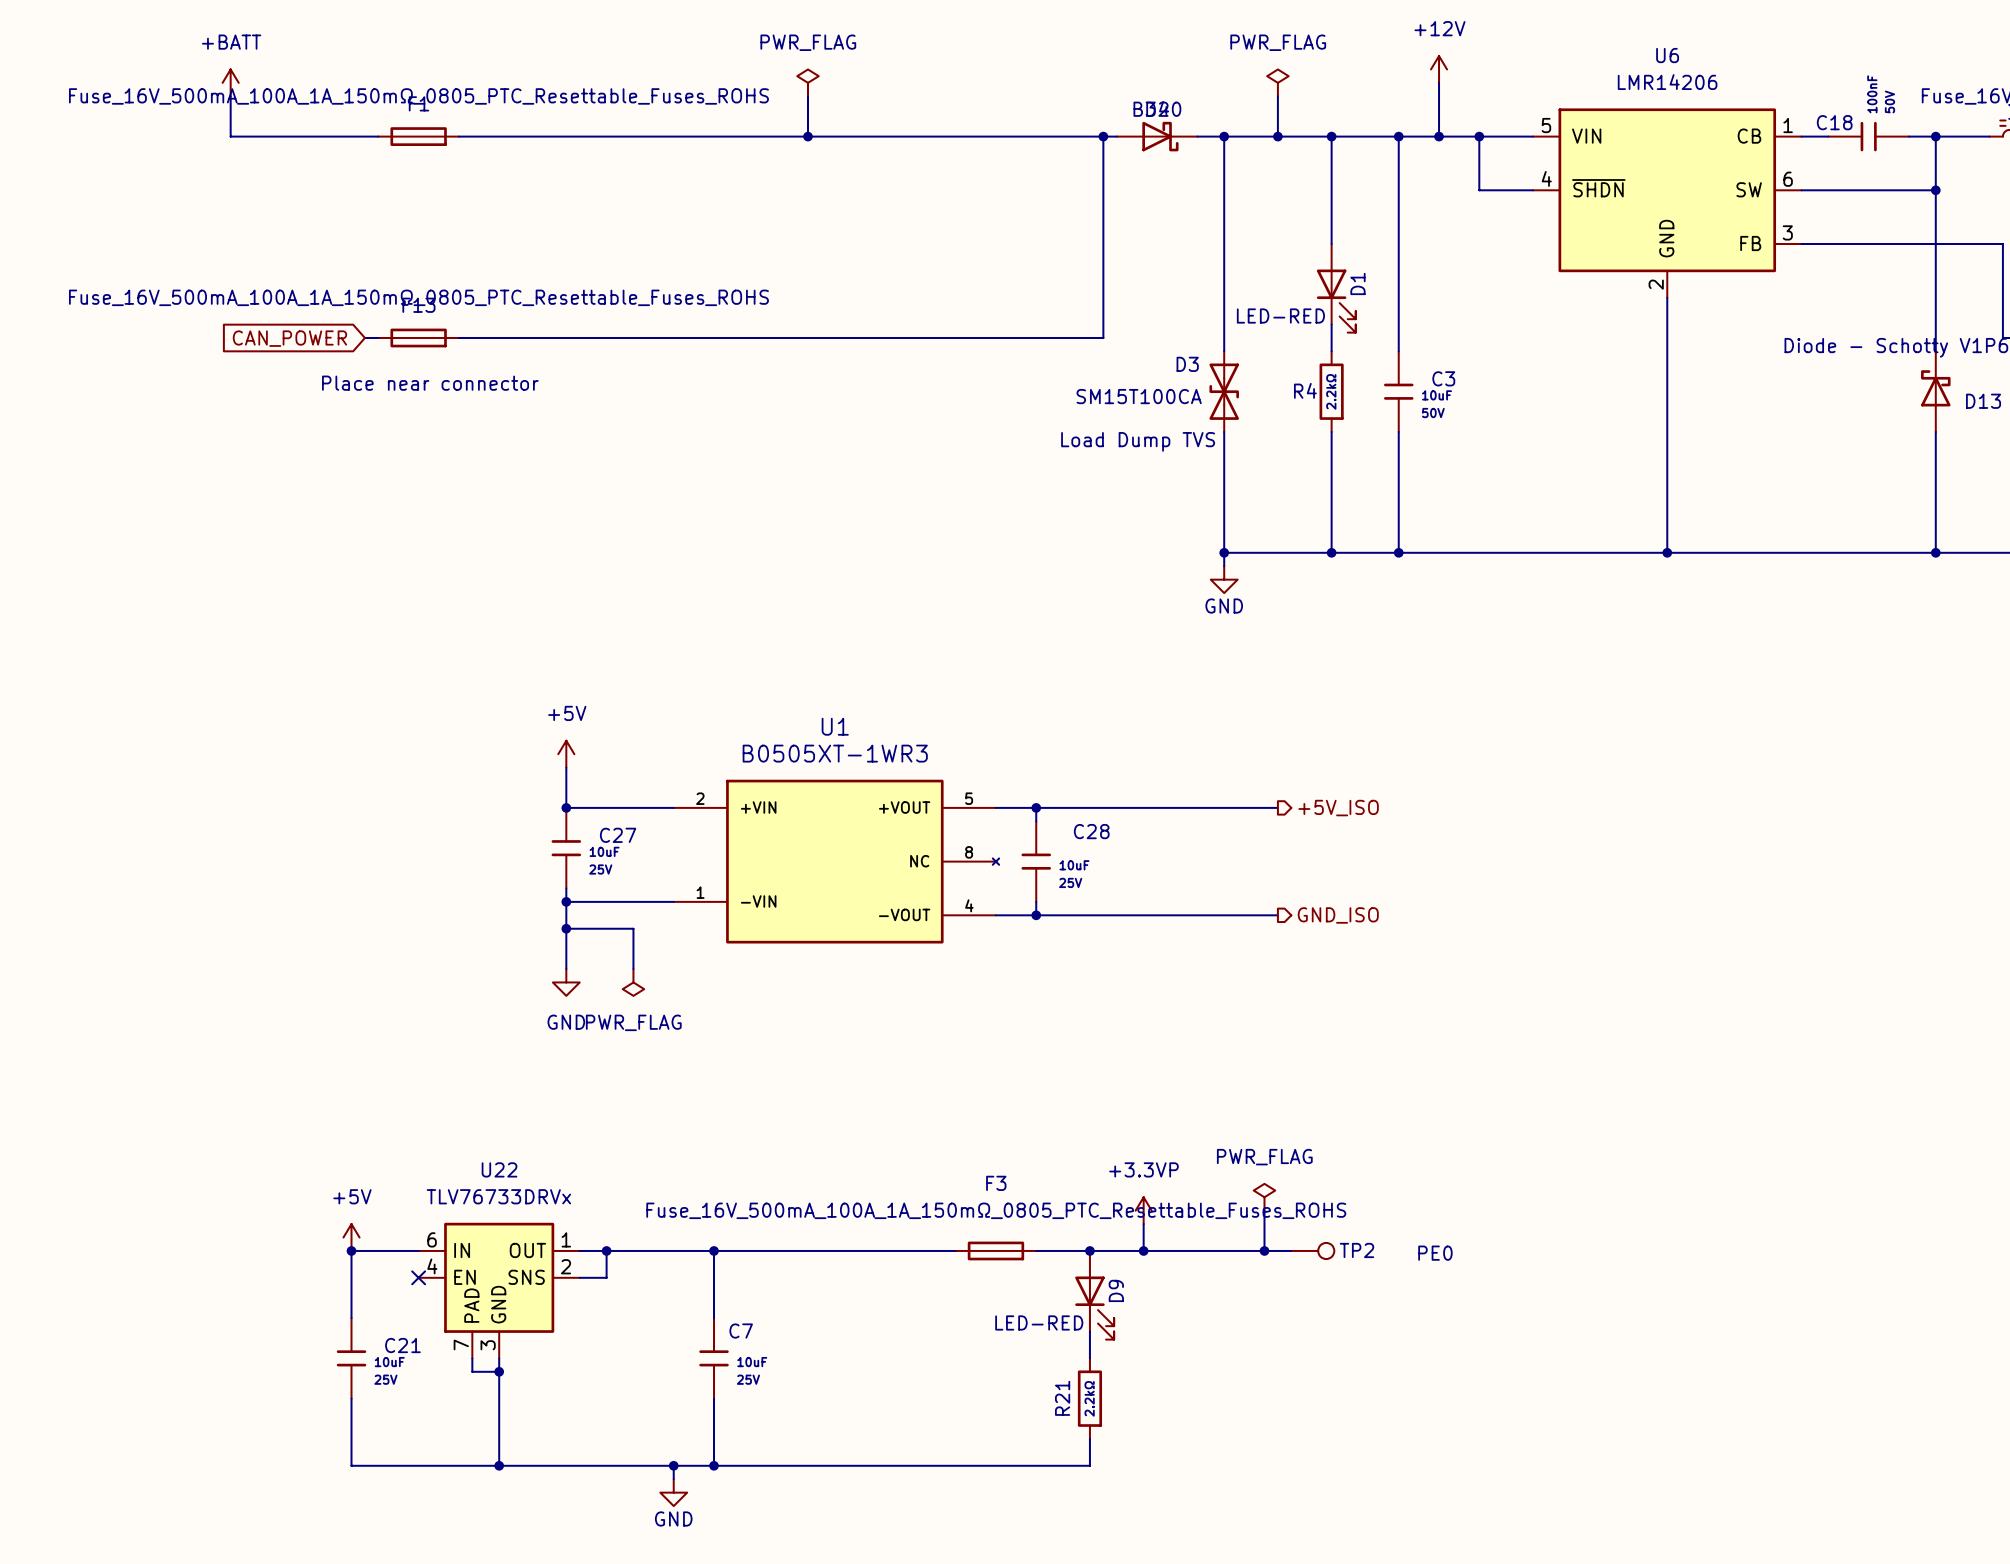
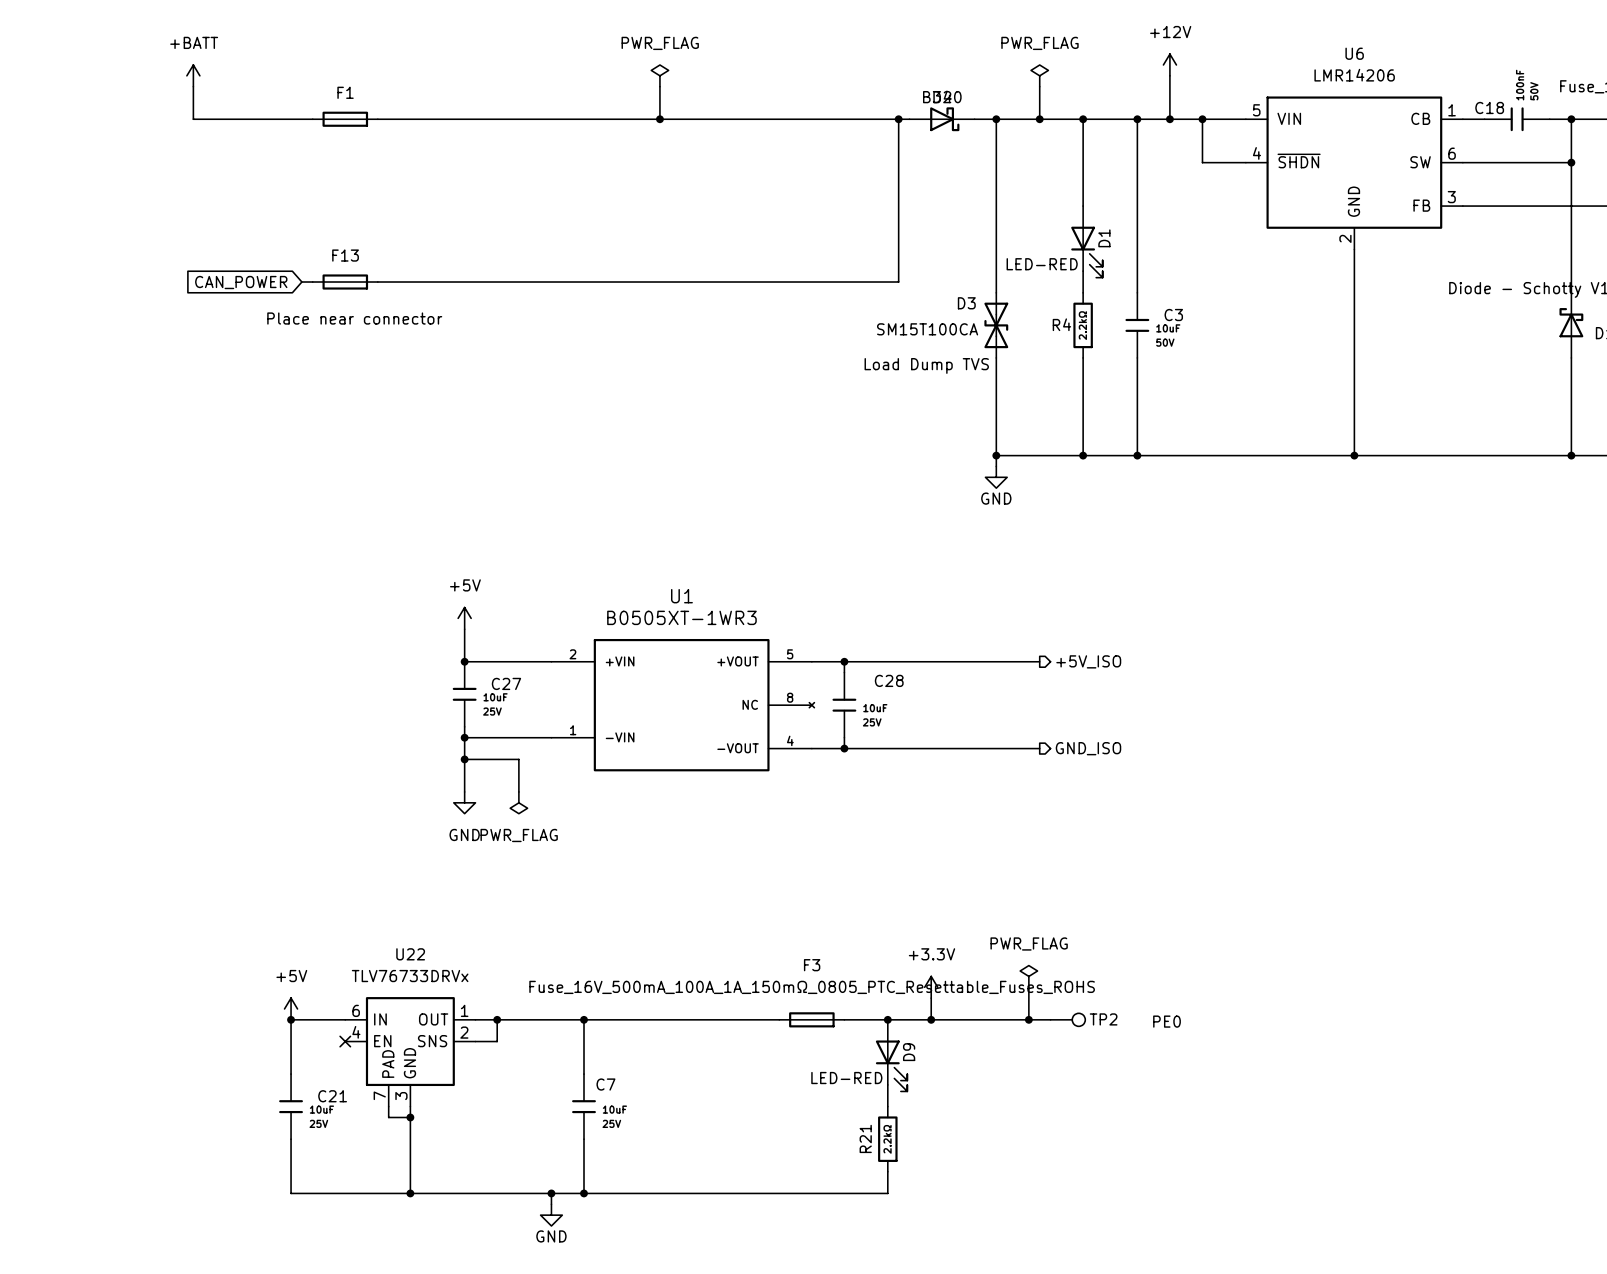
F1 value: Fuse_16V_500mA_100A_1A_150mΩ_0805_PTC_Resettable_Fuses_ROHS (418, 96) -> none
F13 value: Fuse_16V_500mA_100A_1A_150mΩ_0805_PTC_Resettable_Fuses_ROHS (418, 297) -> none
power symbol: +3.3VP (1143, 1210) -> +3.3V (931, 987)

